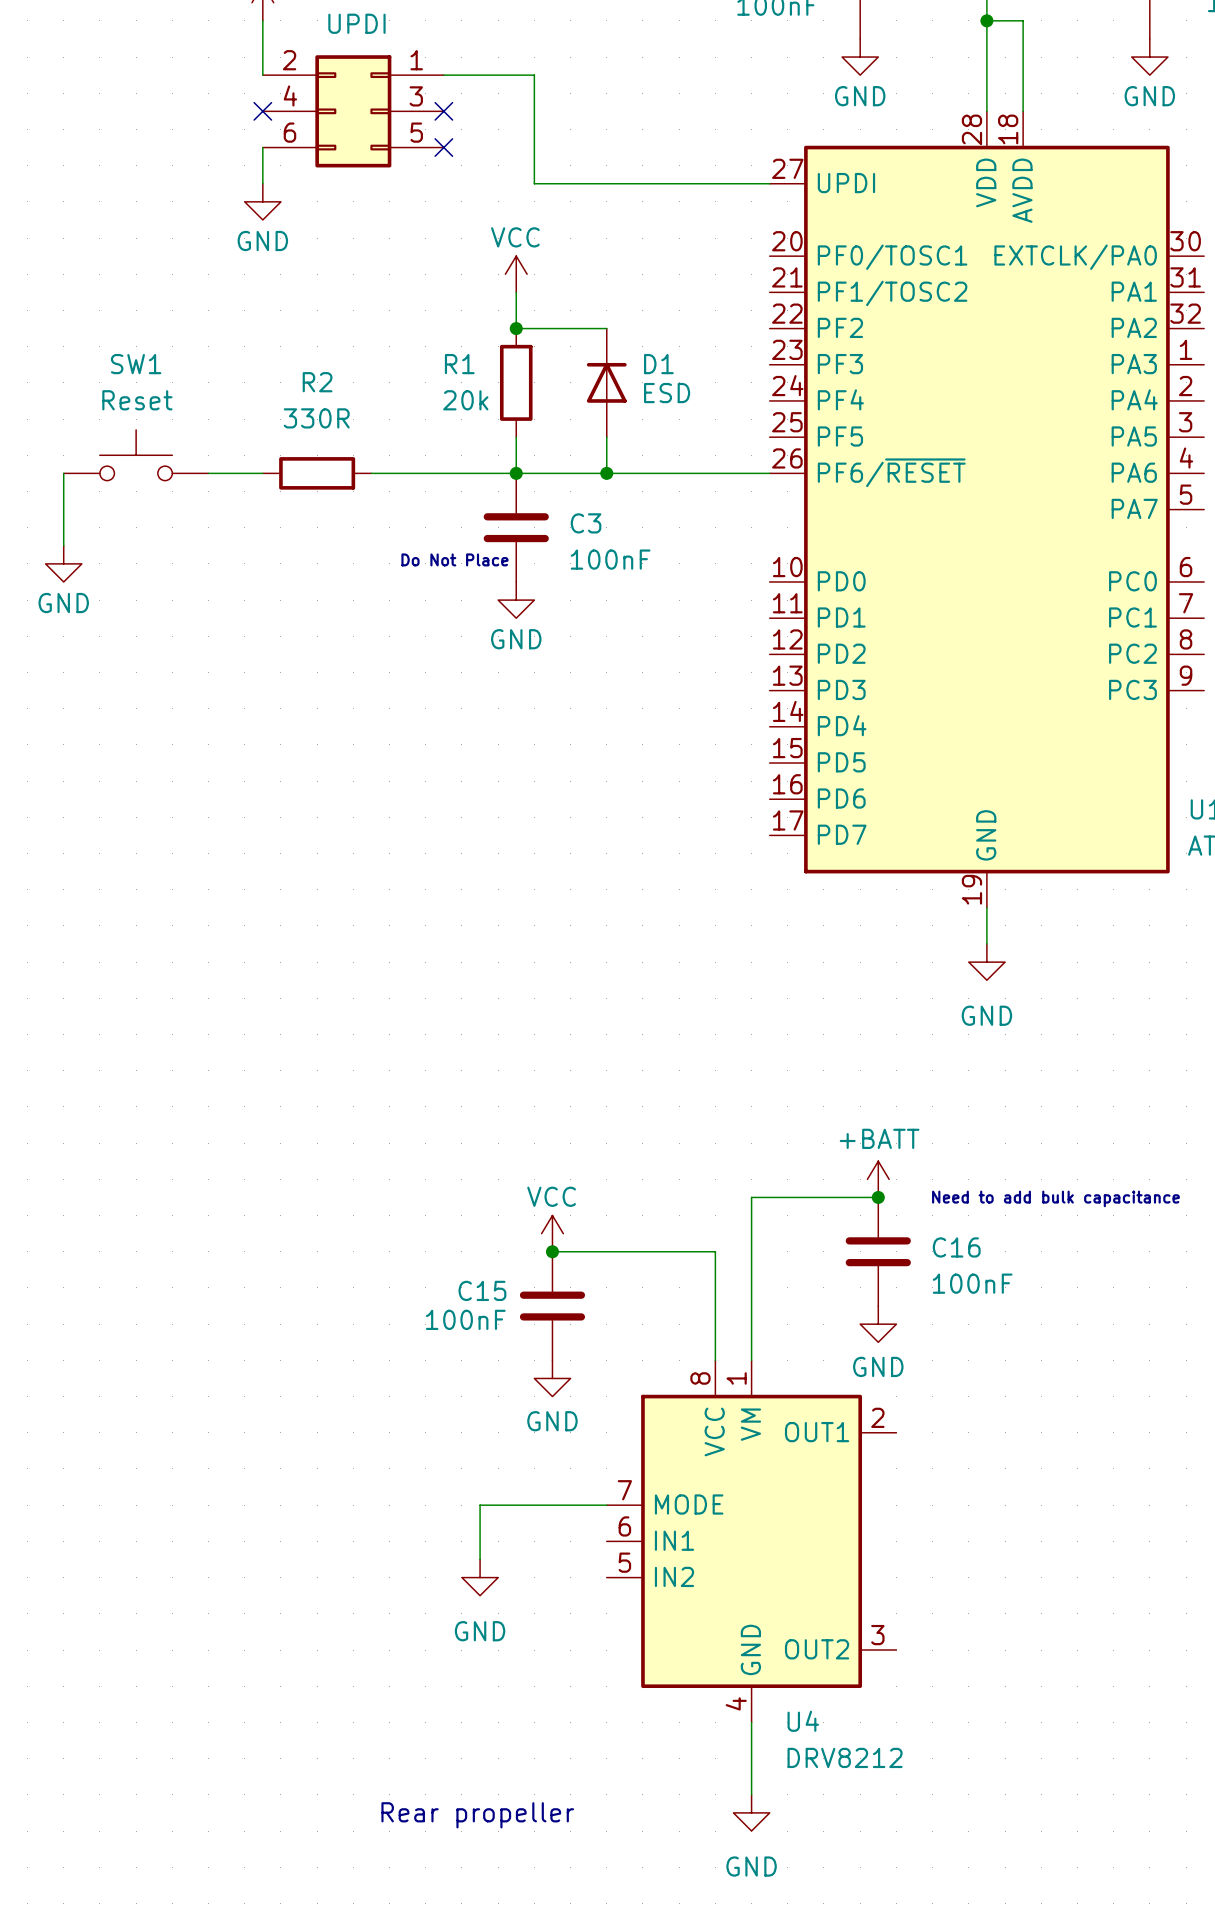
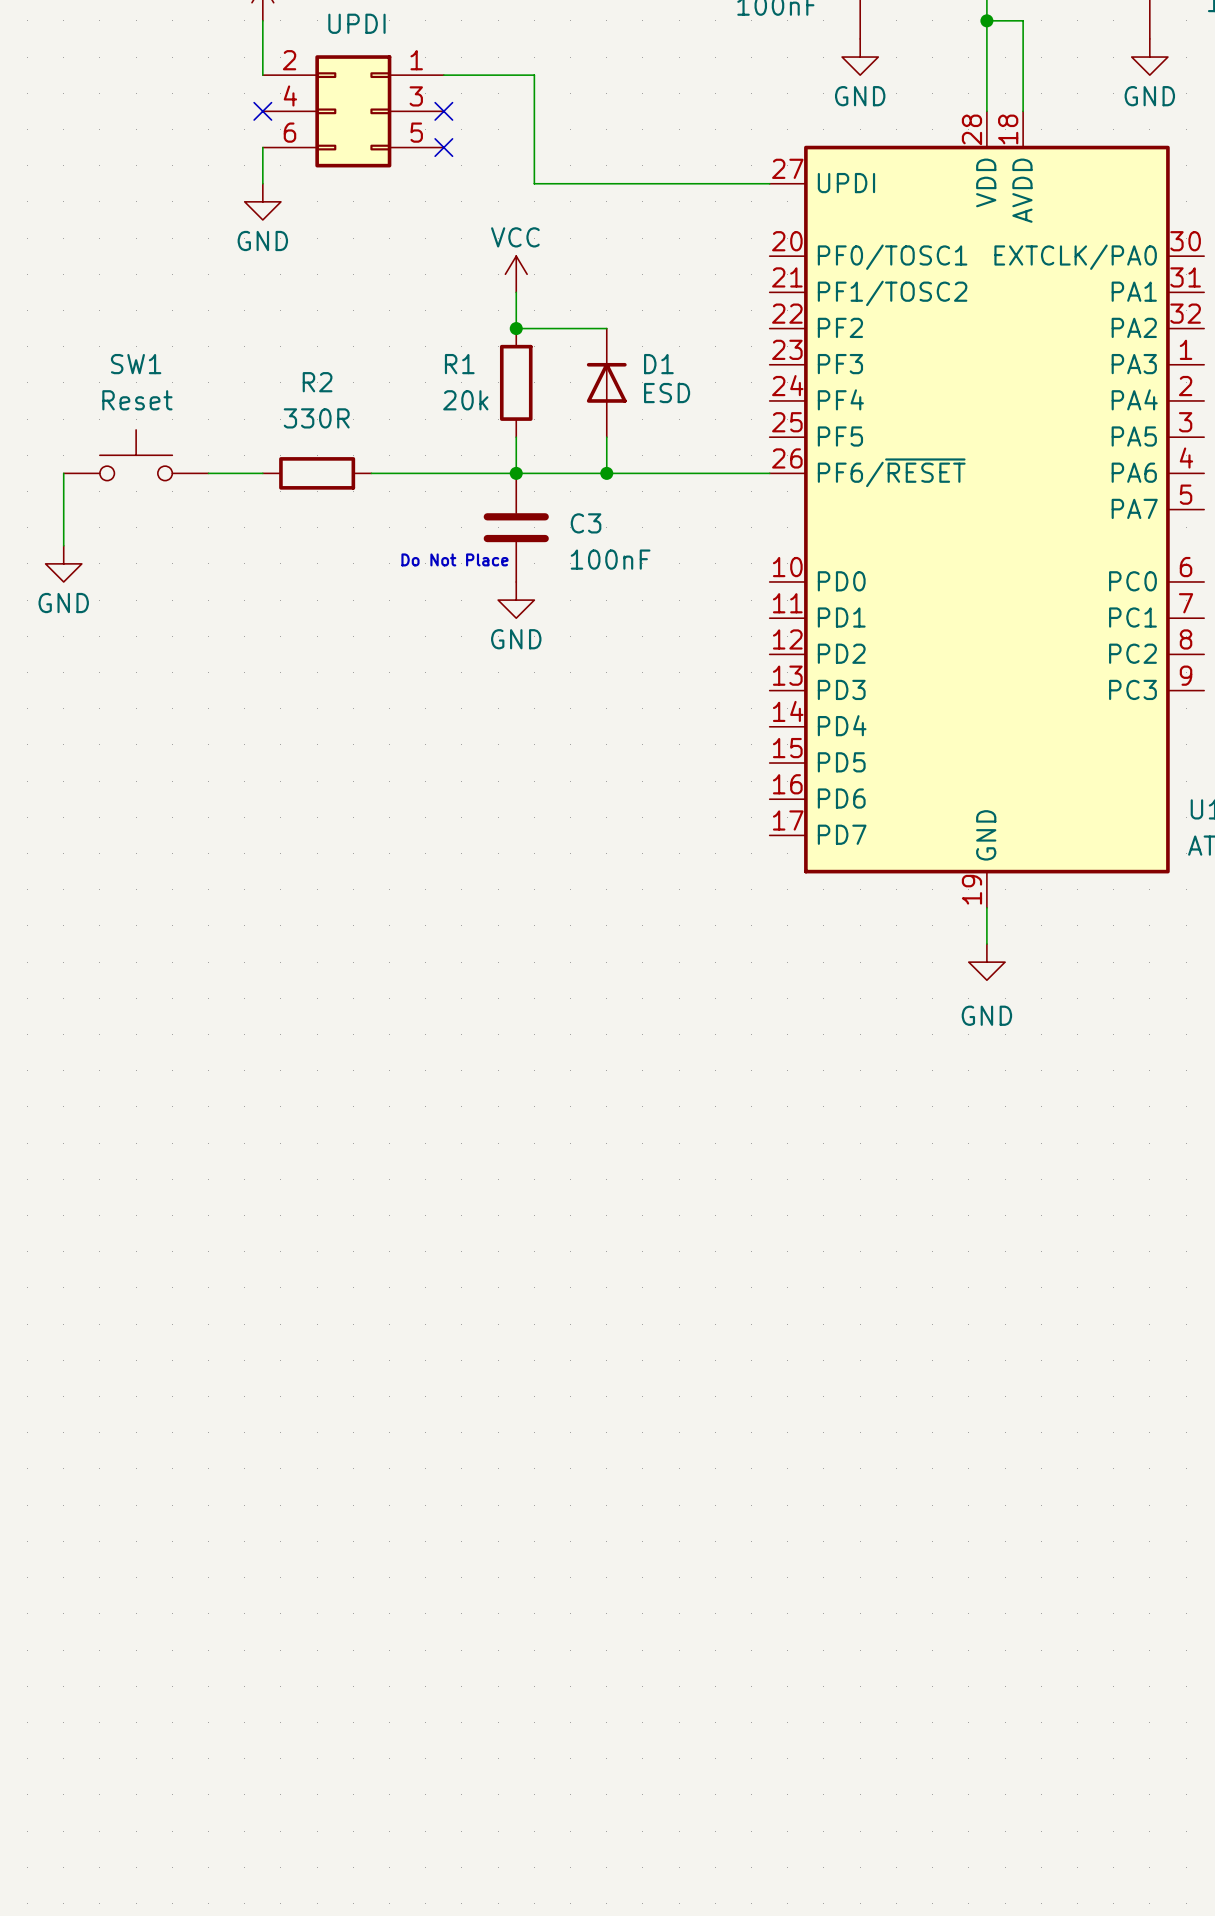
power symbol: +BATT (878, 1179) -> none
wire: (878, 1197) (751, 1197) (751, 1360) -> none
junction: (878, 1197) -> none
text: Need to add bulk capacitance (1055, 1198) -> none
power symbol: VCC (552, 1233) -> none
wire: (552, 1251) (715, 1251) (715, 1360) -> none
junction: (552, 1251) -> none
C16: 100nF (878, 1251) -> none
C15: 100nF (552, 1306) -> none
power symbol: GND (878, 1324) -> none
power symbol: GND (552, 1378) -> none
wire: (606, 1505) (480, 1505) (480, 1559) -> none
U4: DRV8212 (751, 1541) -> none
power symbol: GND (480, 1577) -> none
wire: (751, 1722) (751, 1794) -> none
power symbol: GND (751, 1812) -> none
text: Rear propeller (477, 1815) -> none

